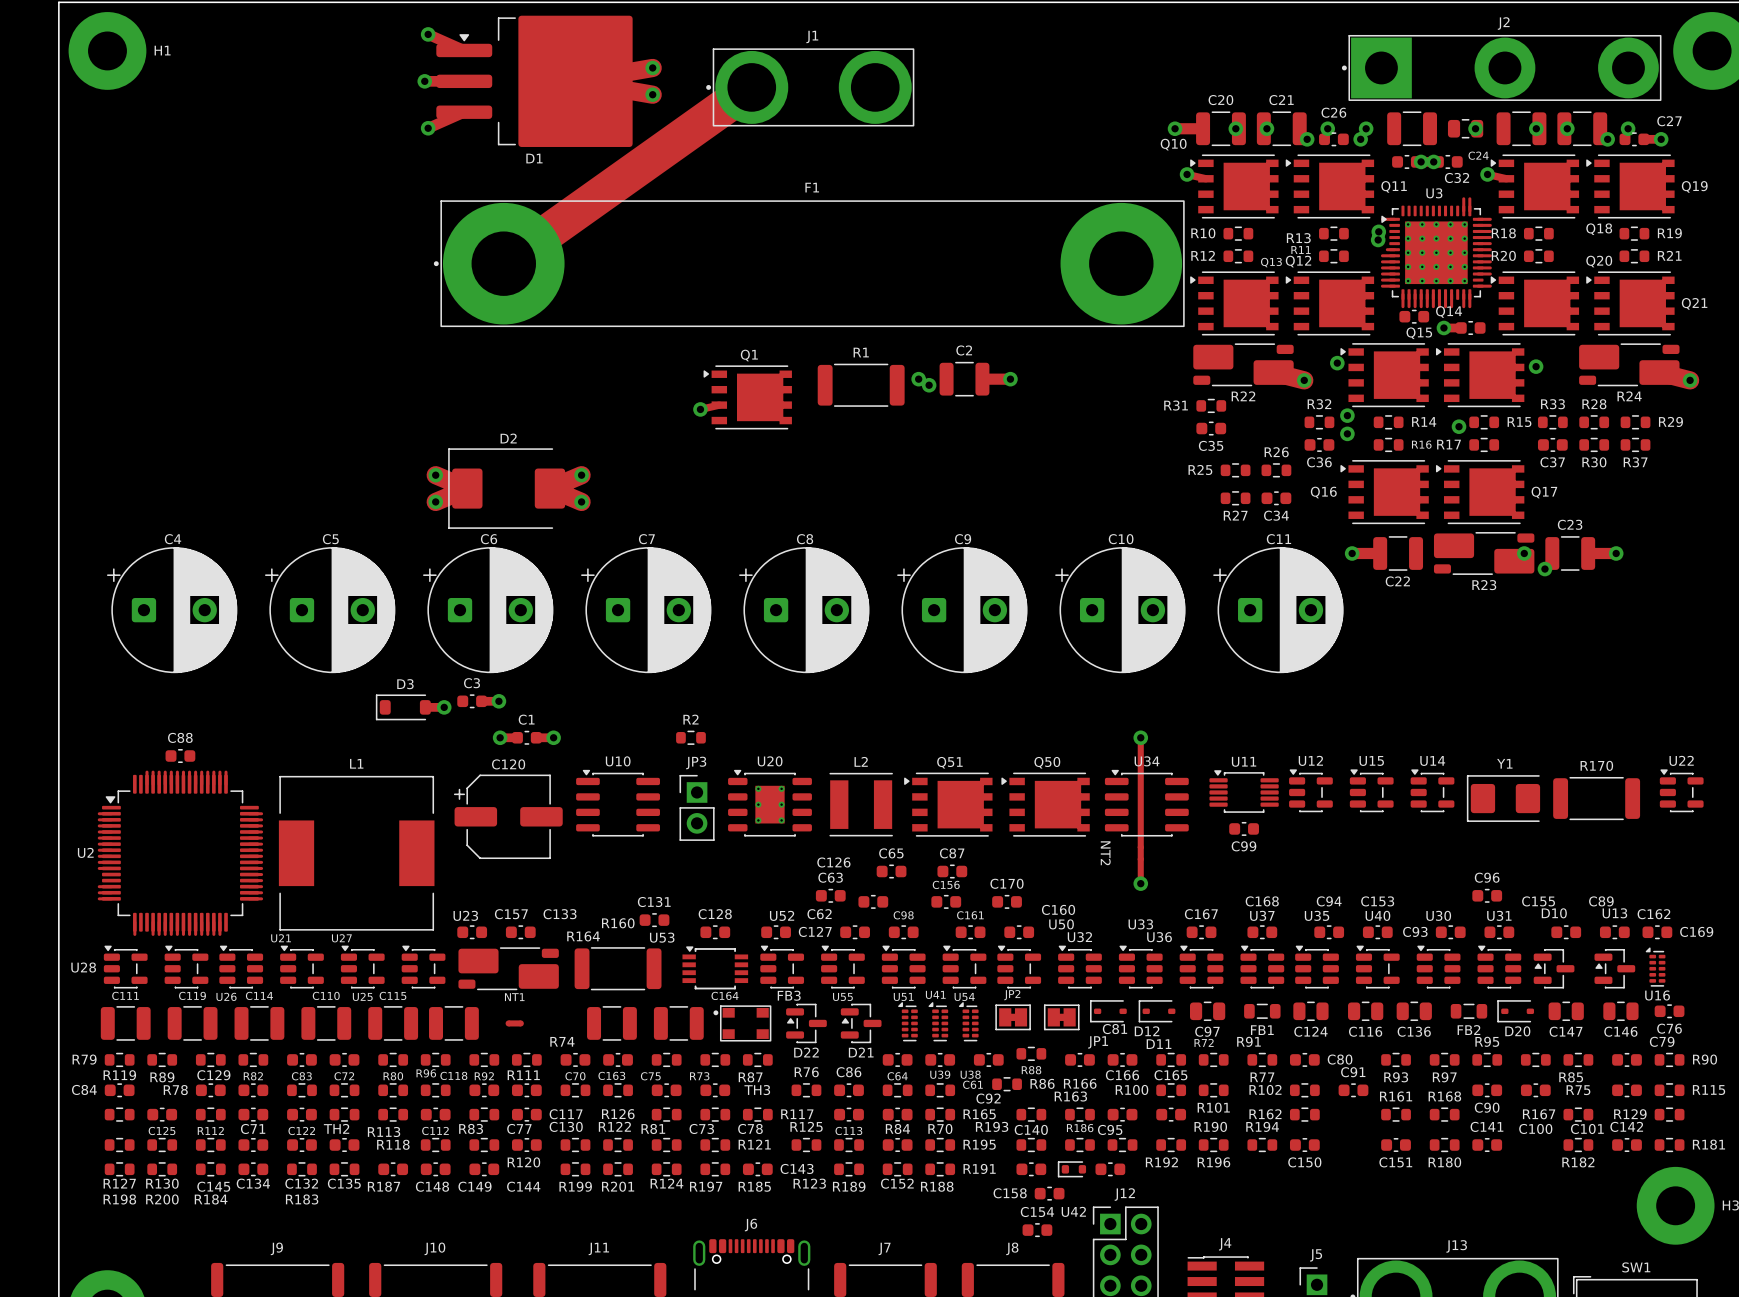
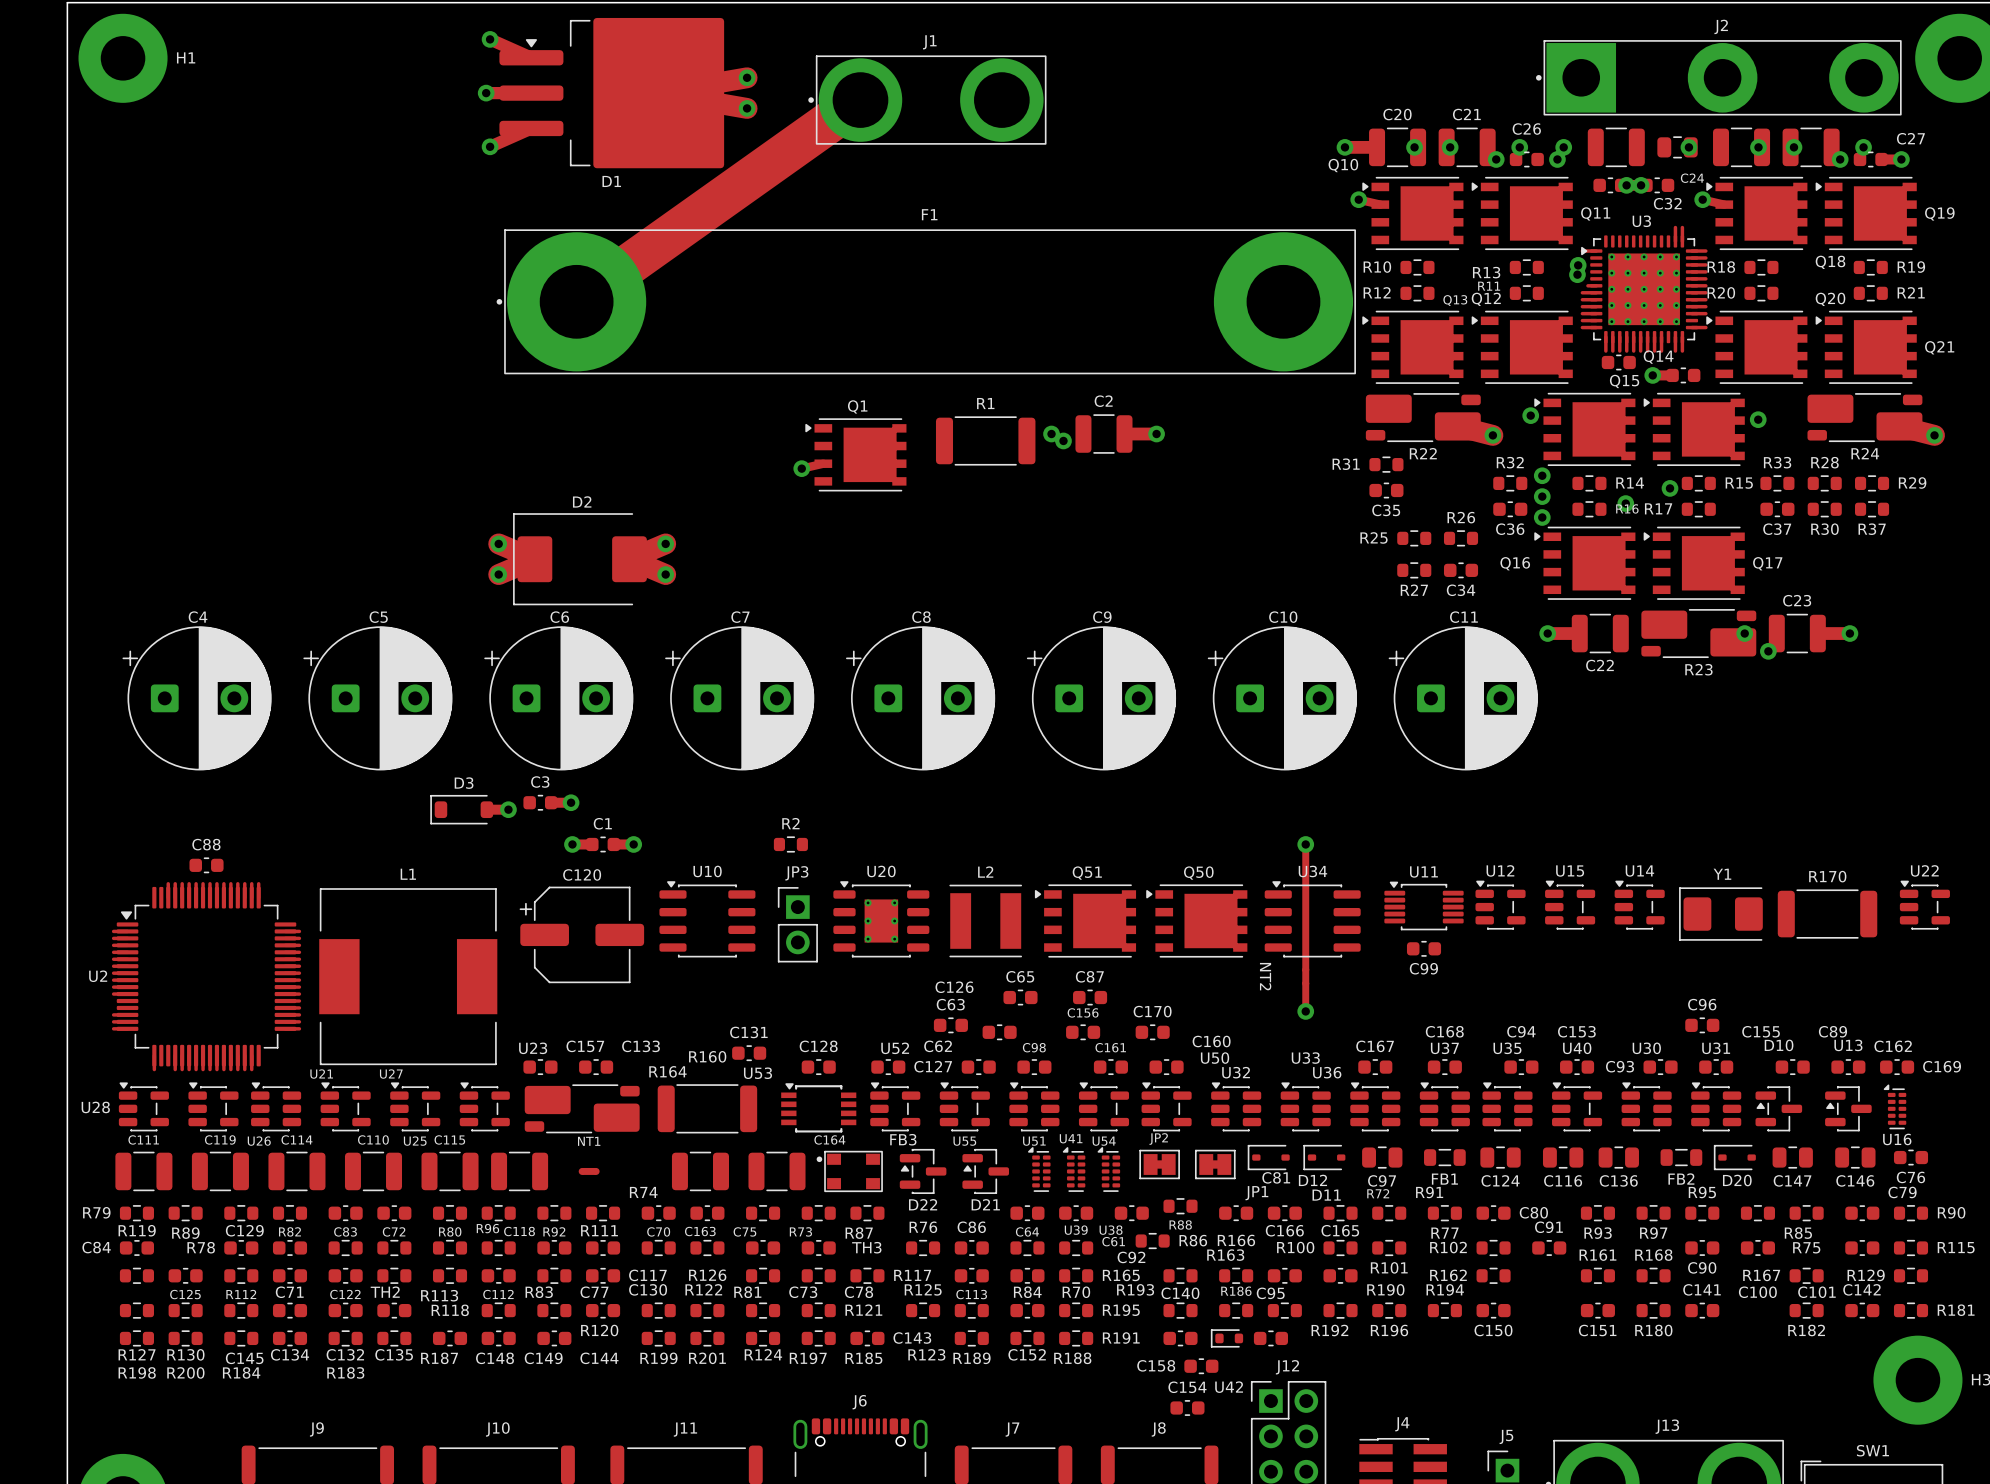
via: none -> (1625, 503)
via: none -> (1542, 517)

